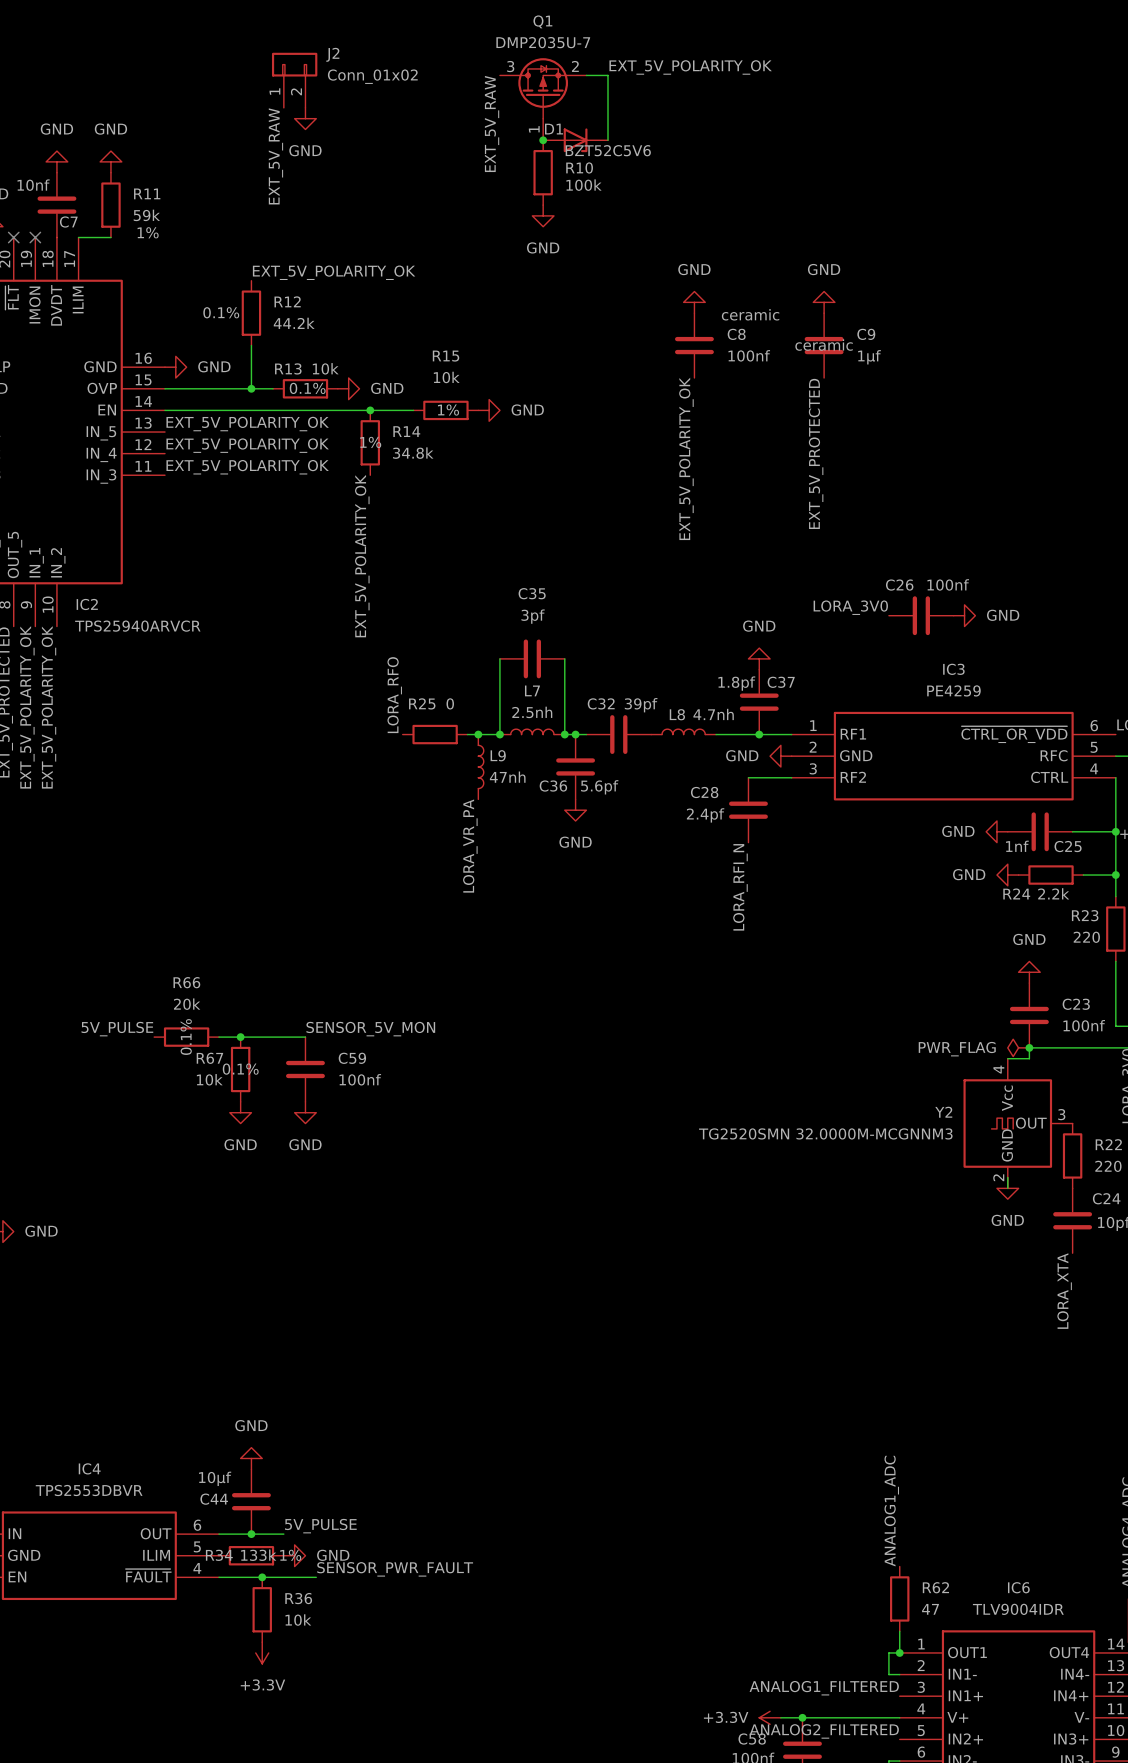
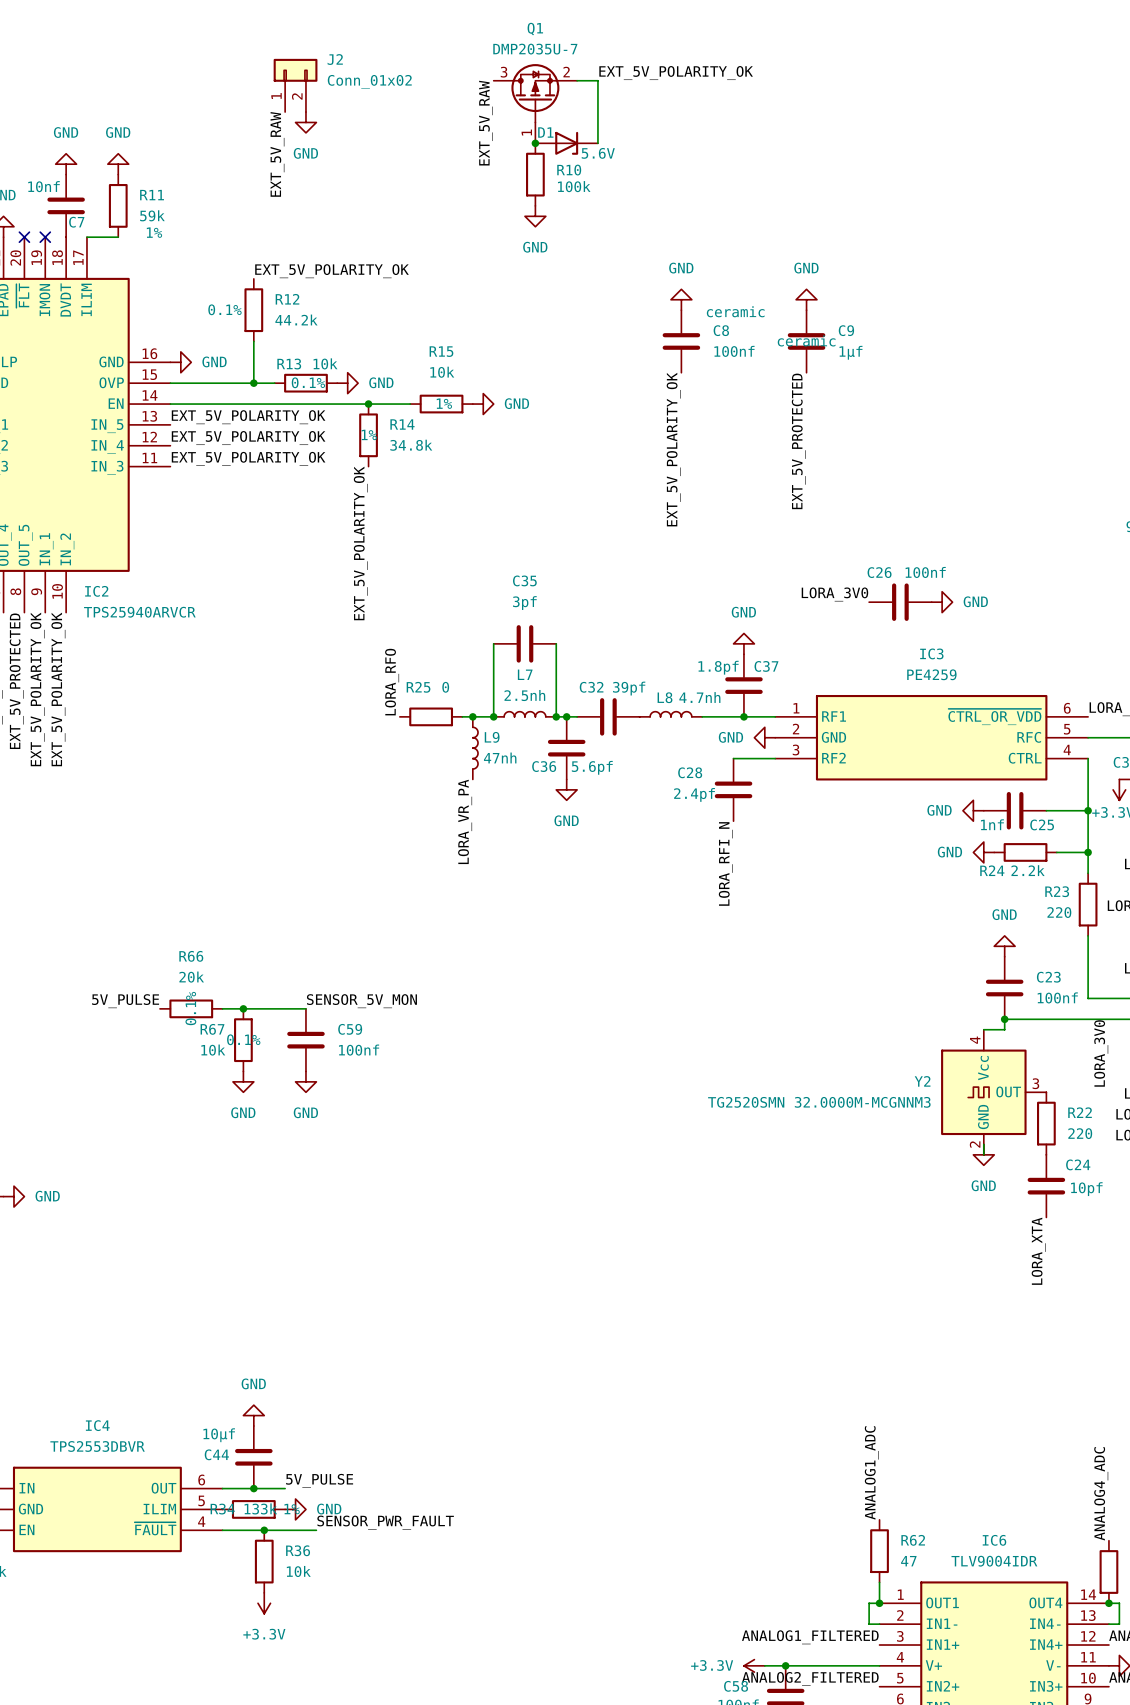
D1 value: BZT52C5V6 (608, 150) -> 5.6V (598, 153)
power symbol: PWR_FLAG (1018, 1047) -> none

